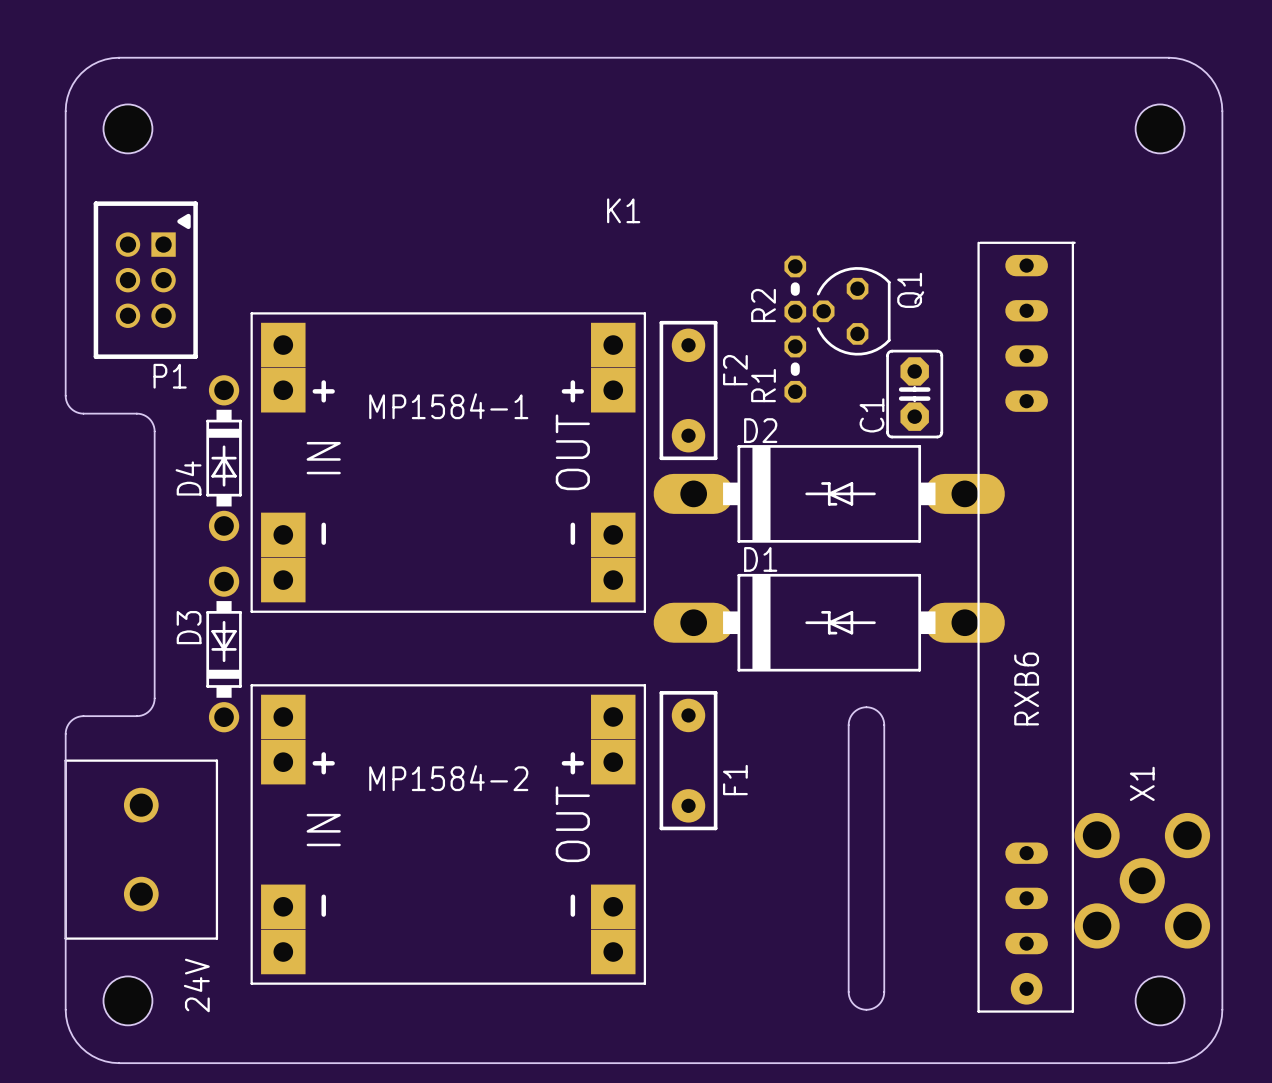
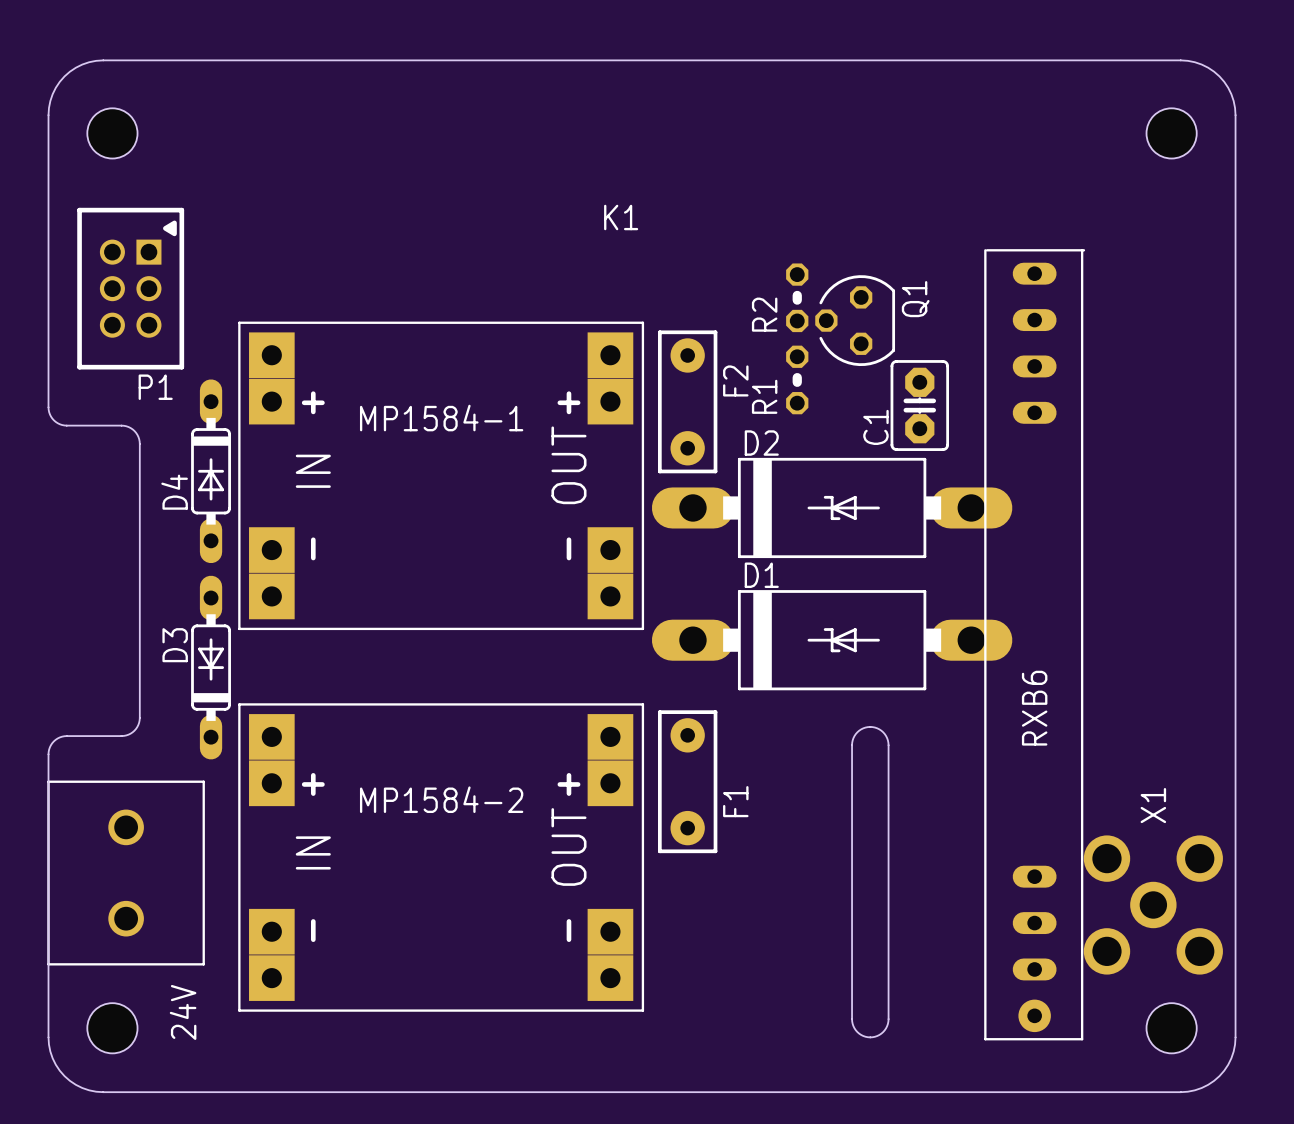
D4 footprint: [206, 375, 242, 542] -> [191, 379, 231, 564]
D3 footprint: [206, 566, 242, 733] -> [191, 575, 231, 760]

